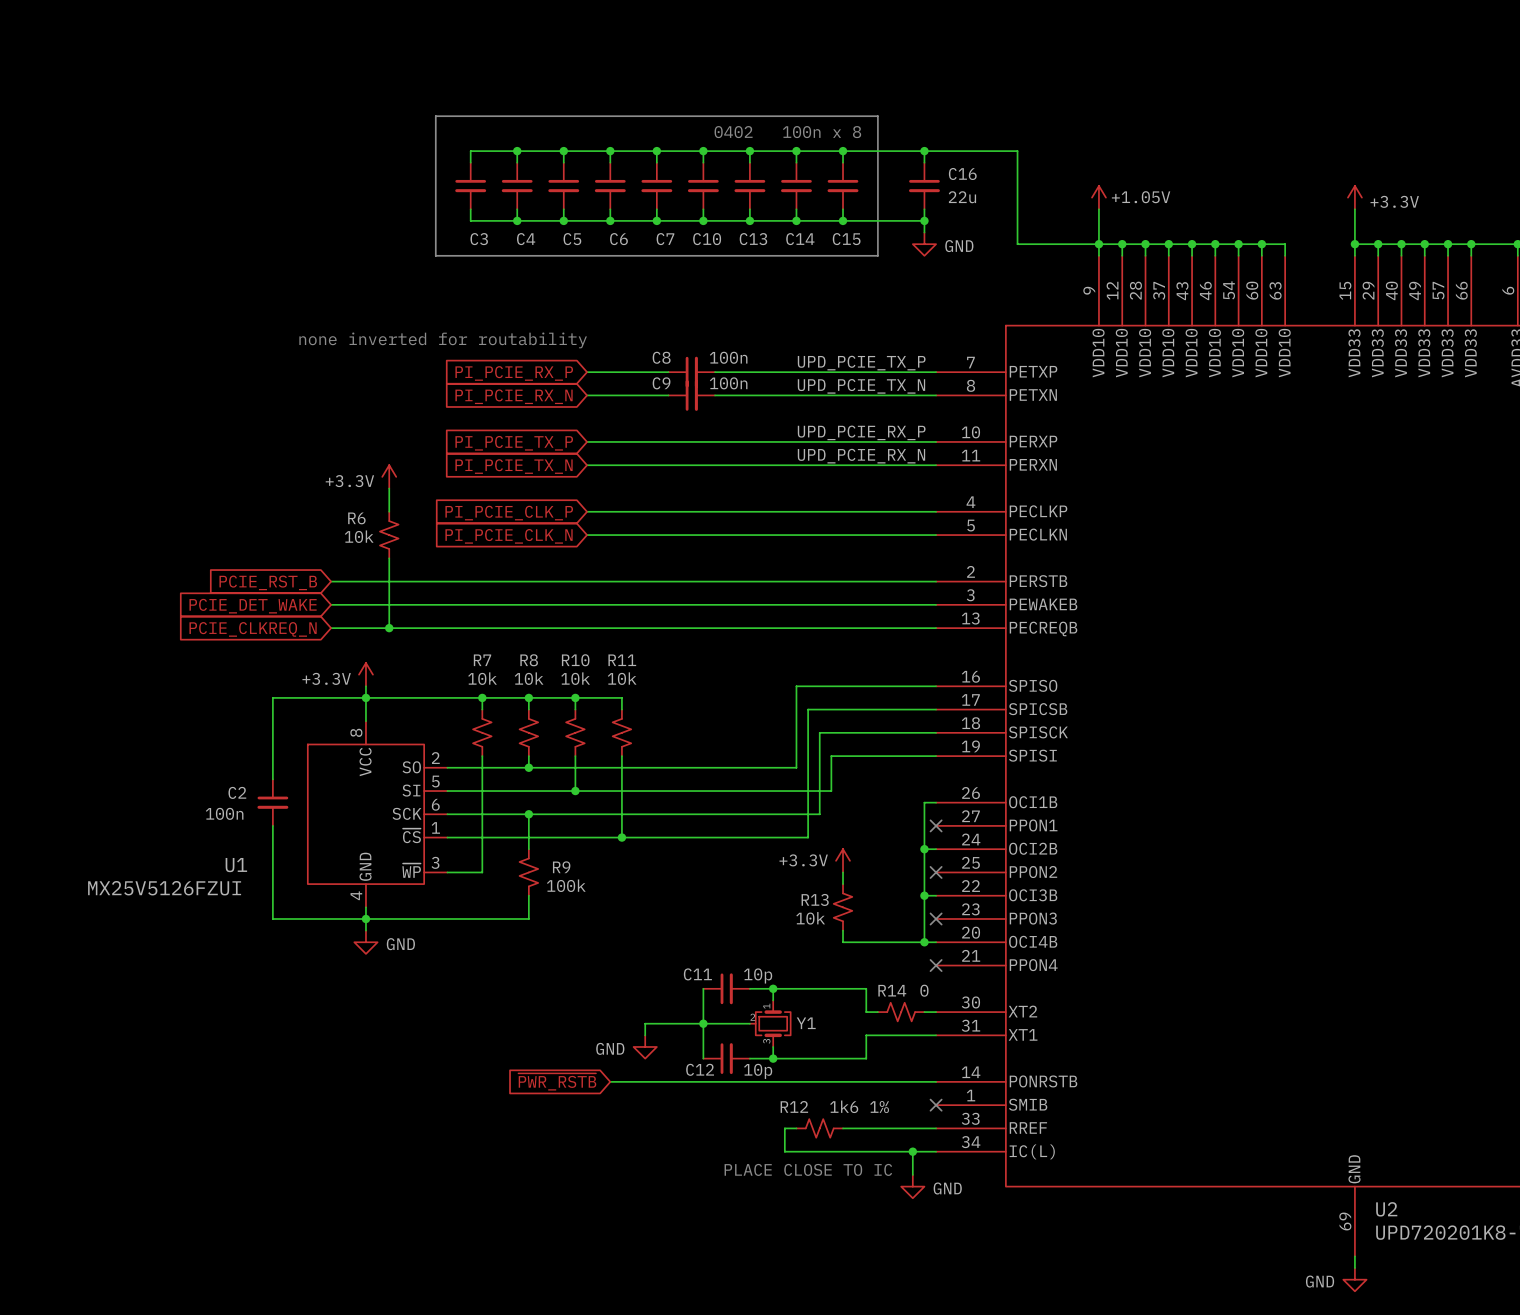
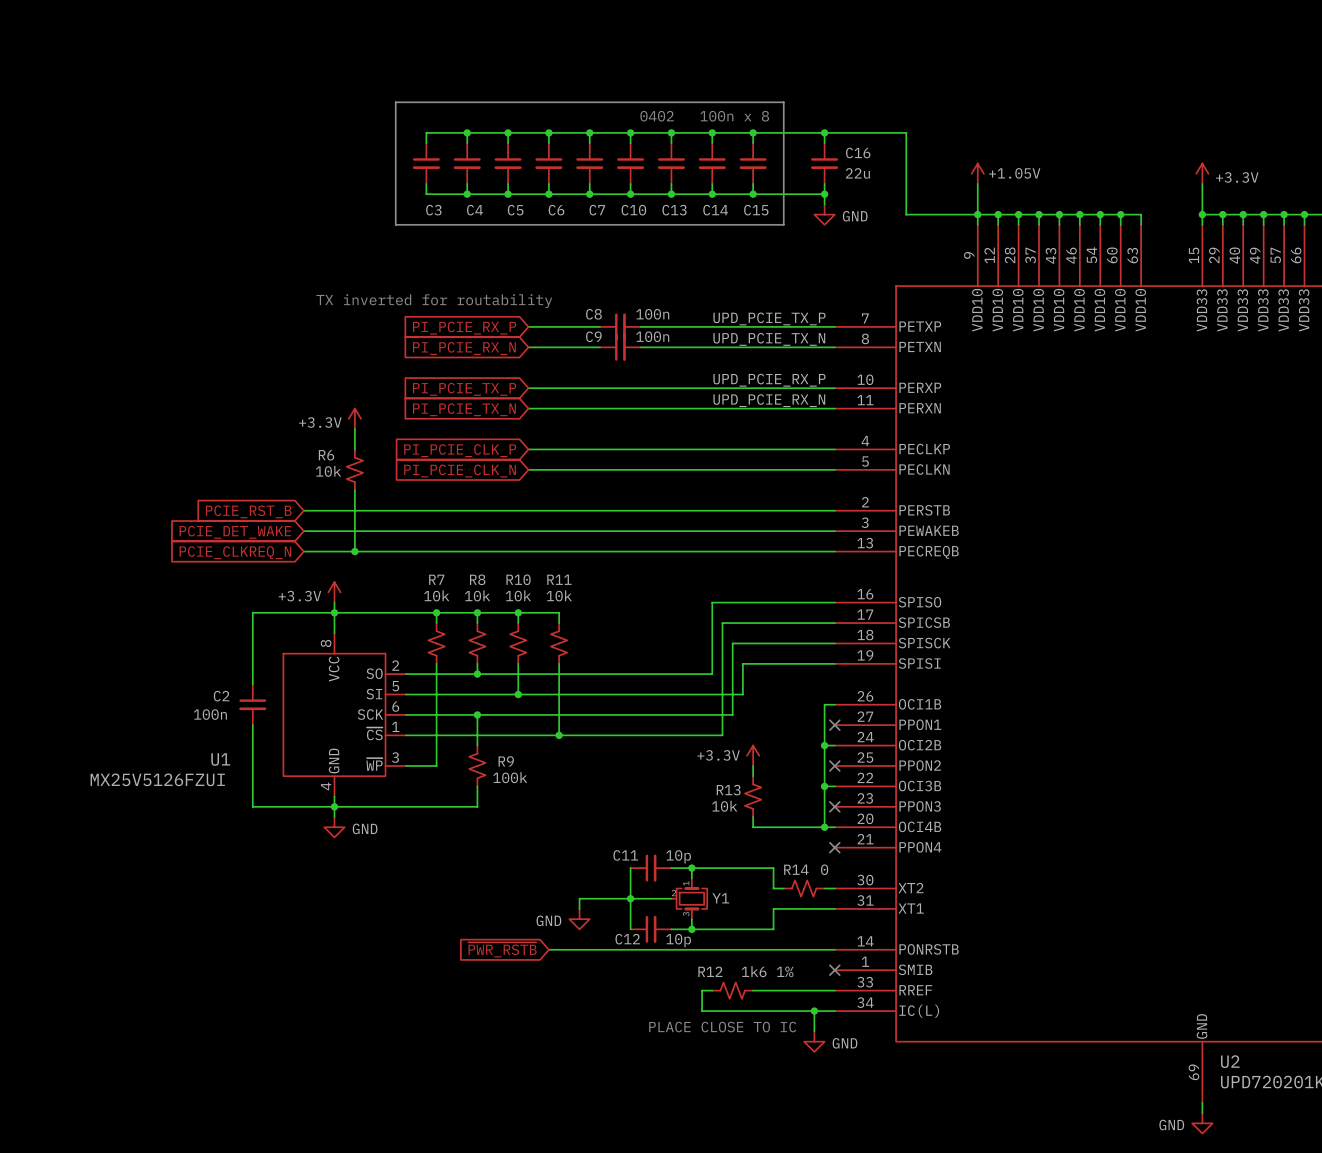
text: none inverted for routability (443, 340) -> TX inverted for routability (434, 301)

